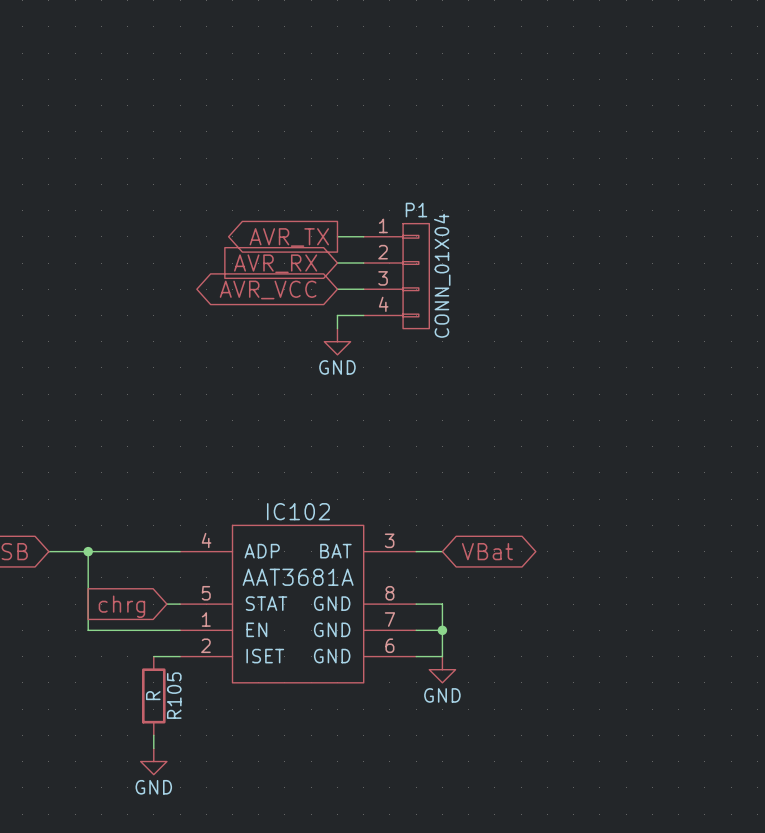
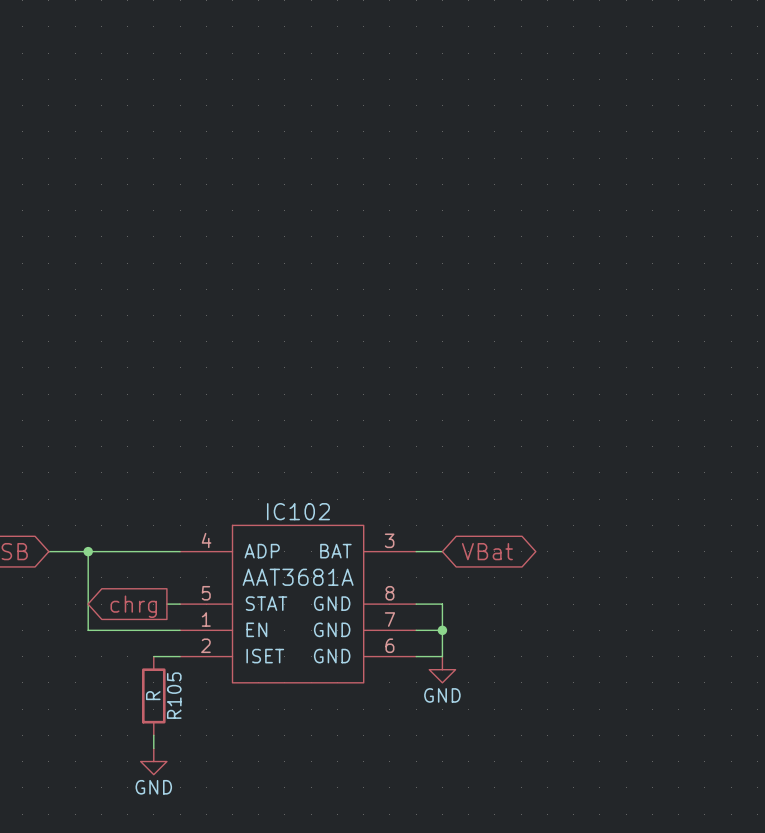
wire: (337, 236) (363, 236) -> none
global label: AVR_TX (289, 237) -> none
global label: AVR_RX (275, 263) -> none
wire: (337, 263) (363, 263) -> none
P1: CONN_01X04 (396, 276) -> none
global label: AVR_VCC (268, 289) -> none
wire: (337, 289) (363, 289) -> none
wire: (363, 315) (337, 315) (337, 328) -> none
power symbol: GND (337, 341) -> none
global label shape: input (121, 606) -> output (133, 606)

